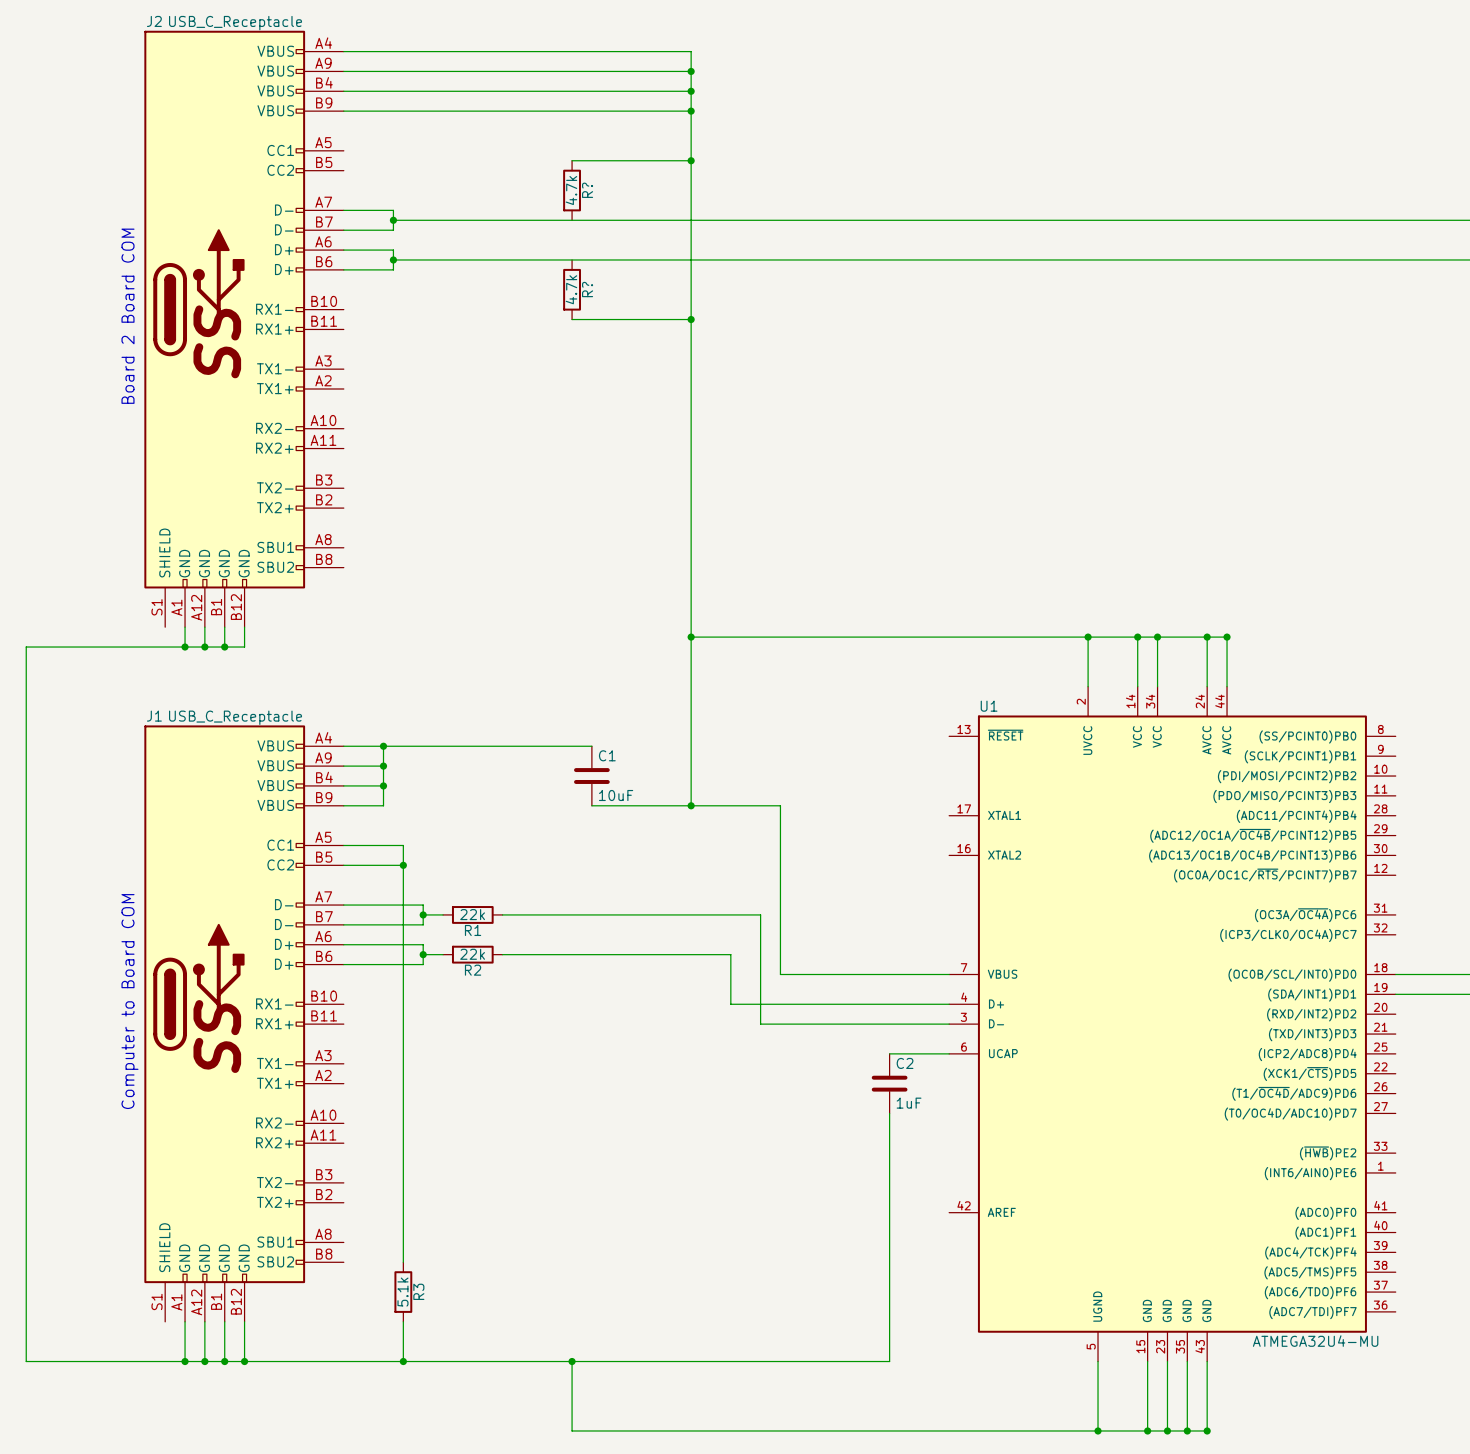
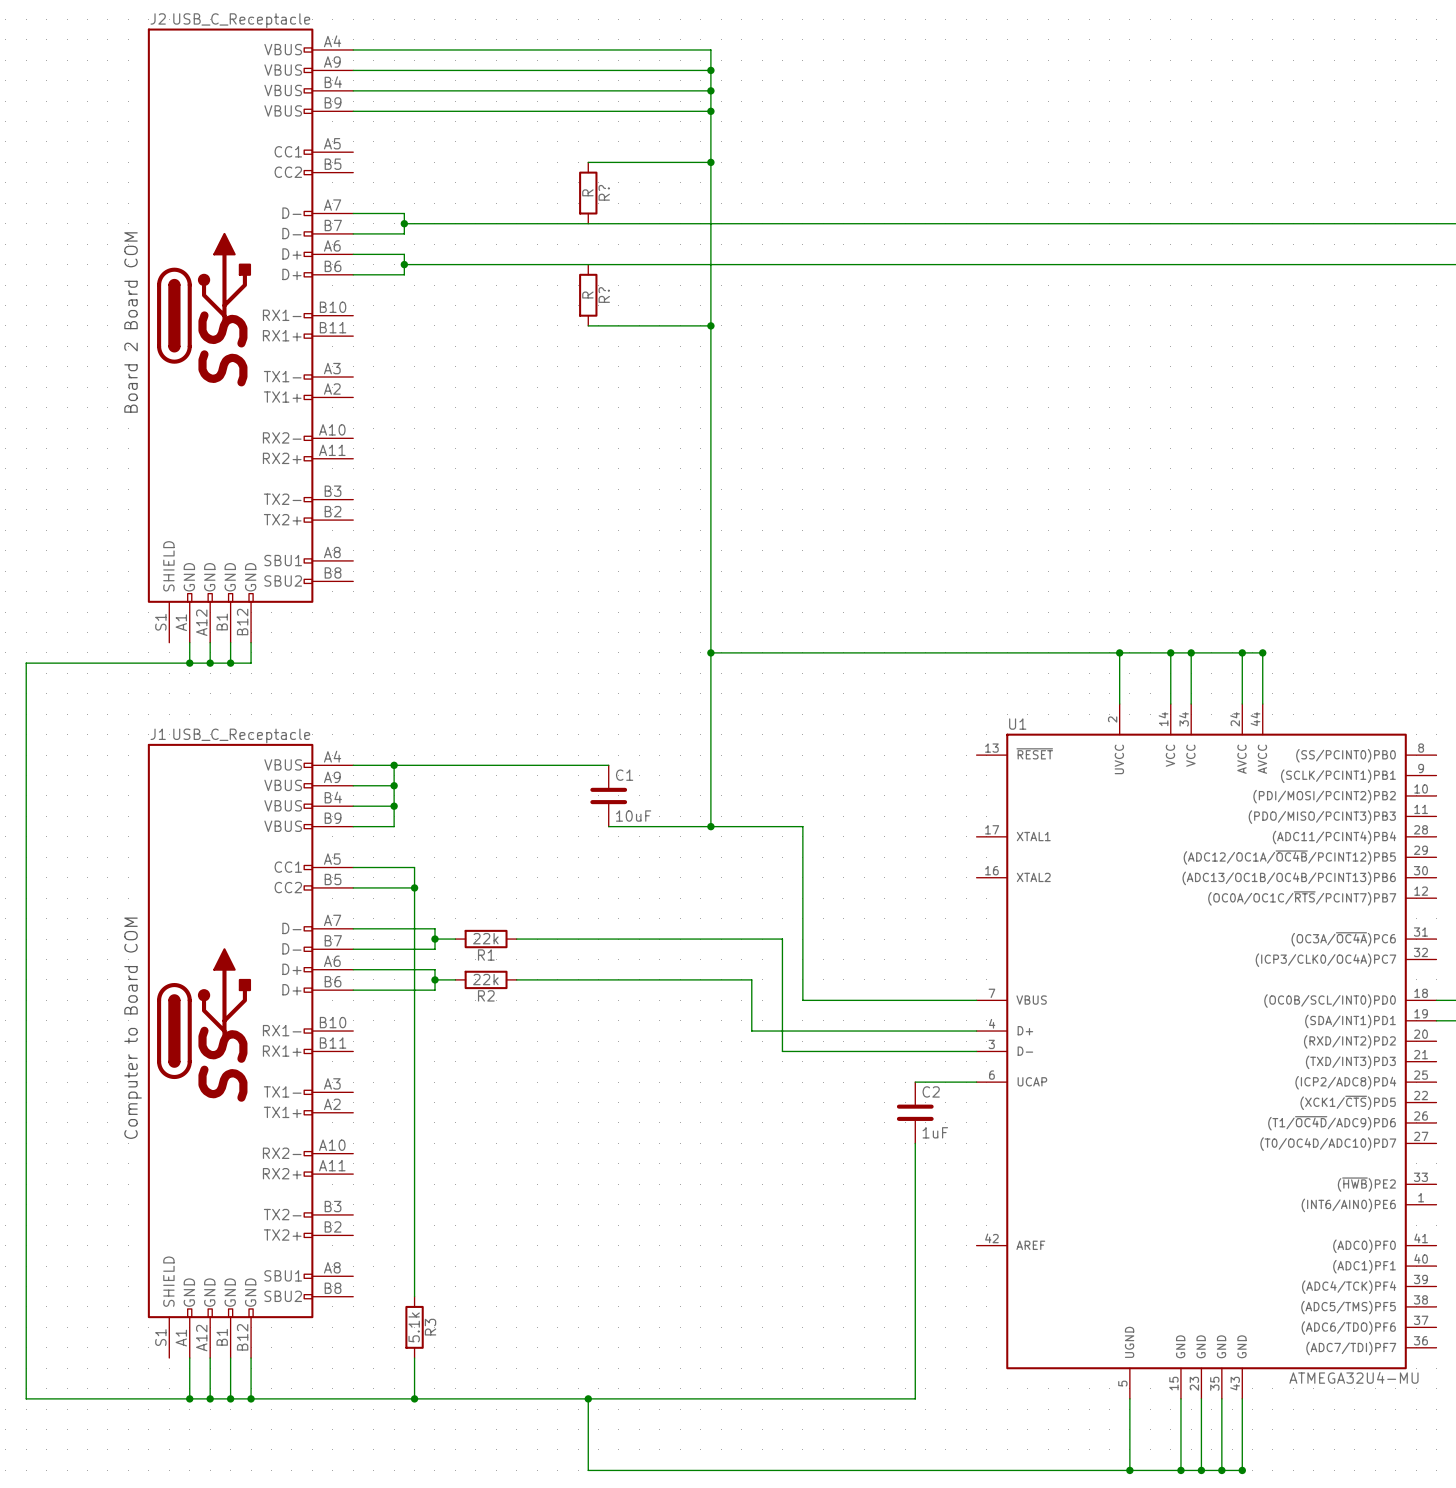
R? value: 4.7k (571, 190) -> R (587, 192)
R? value: 4.7k (571, 289) -> R (587, 295)

